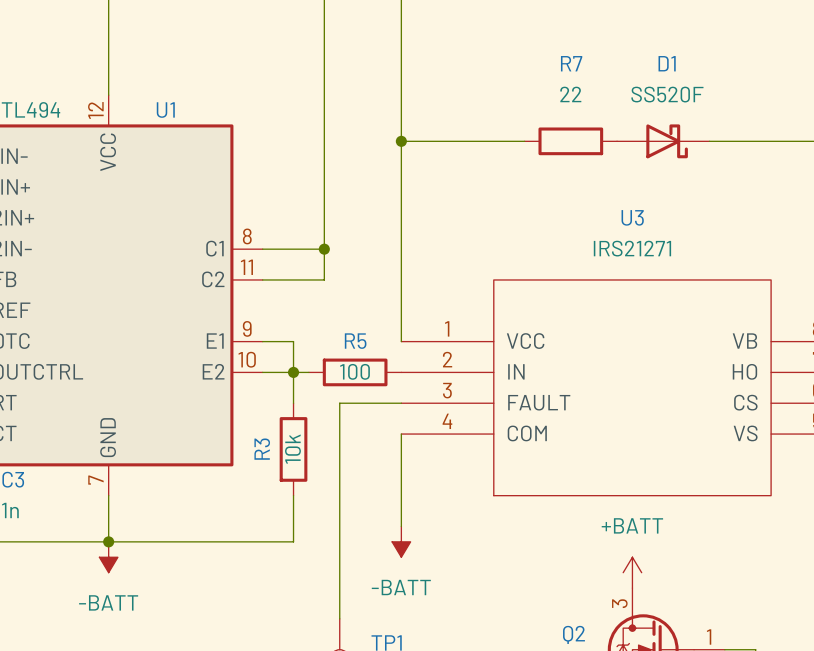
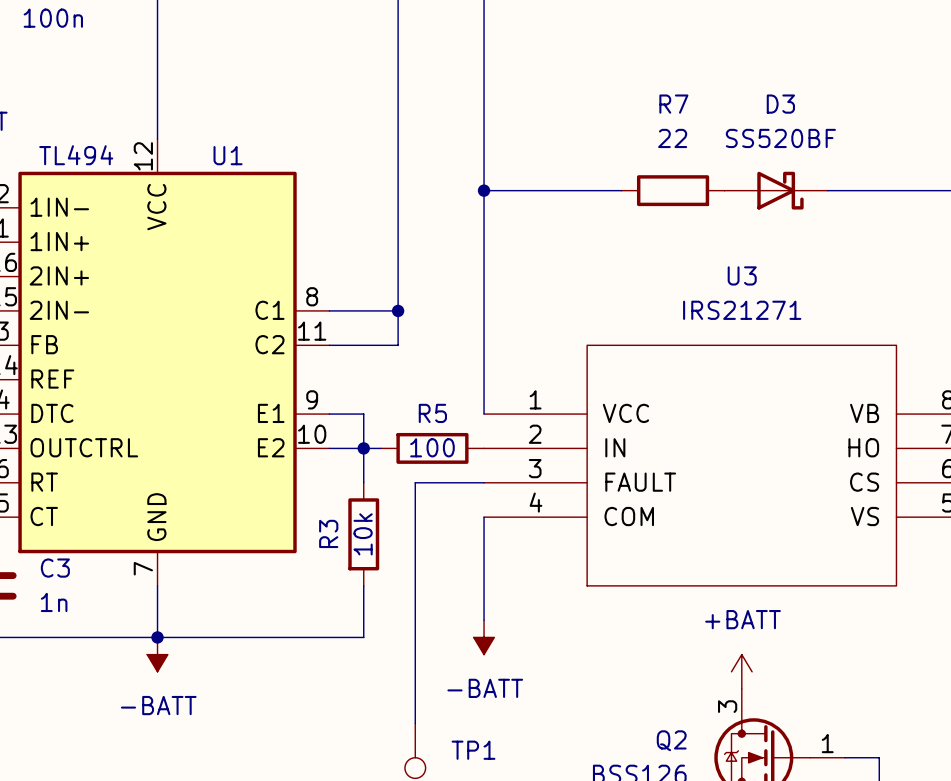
D1 name: D1 (667, 63) -> D3 (780, 104)
D1 value: SS520F (667, 94) -> SS520BF (780, 138)

